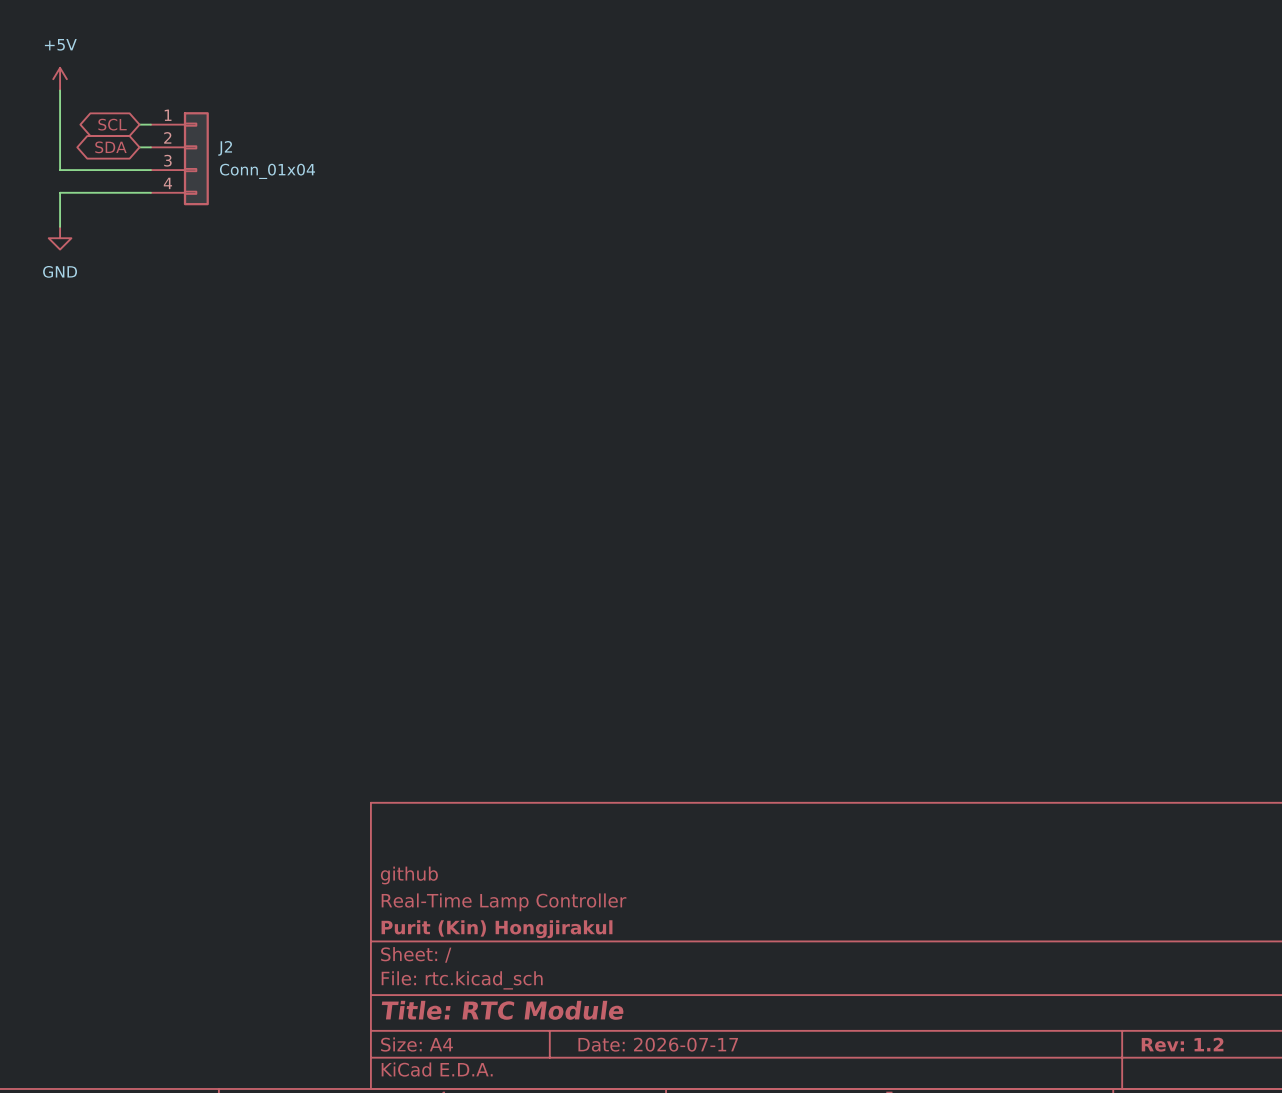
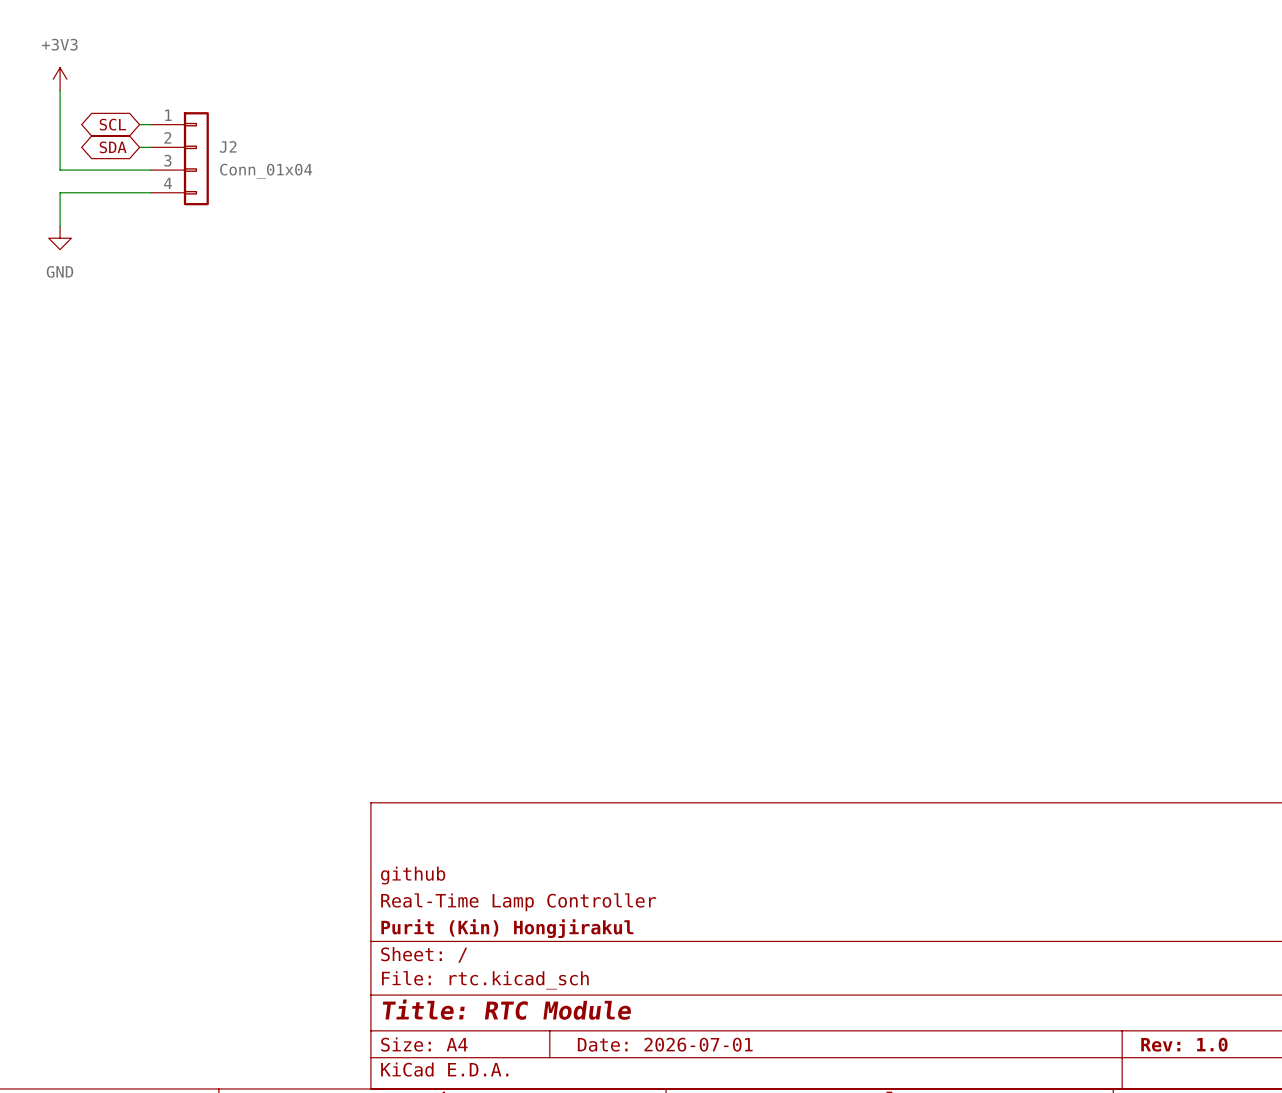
power symbol: +5V (60, 79) -> +3V3 (60, 79)
title block: Date: 2026-07-17 (658, 1044) -> Date: 2026-07-01 (665, 1044)
title block: Rev: 1.2 (1182, 1044) -> Rev: 1.0 (1184, 1044)

